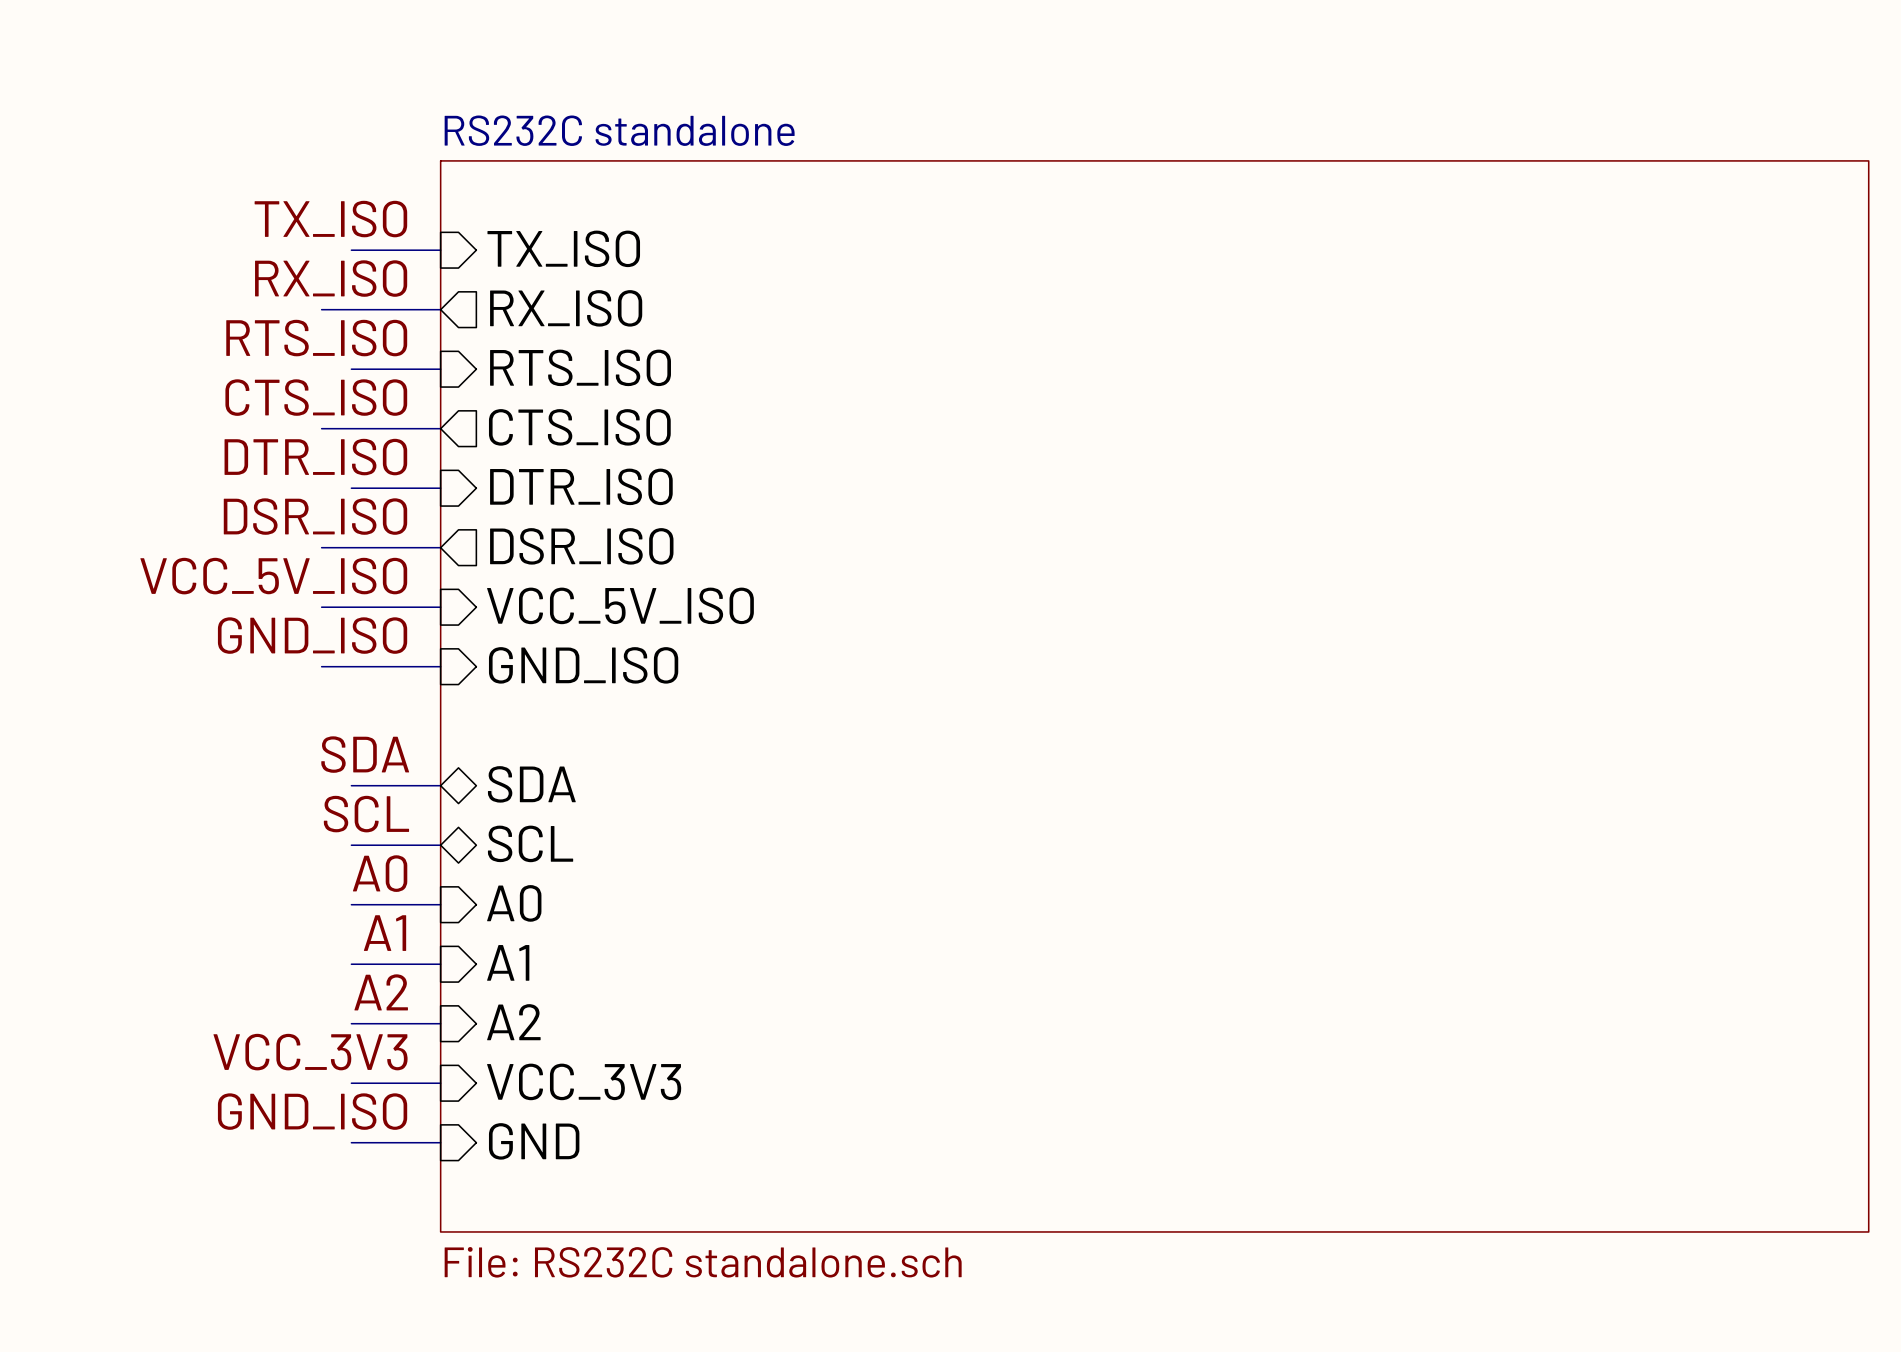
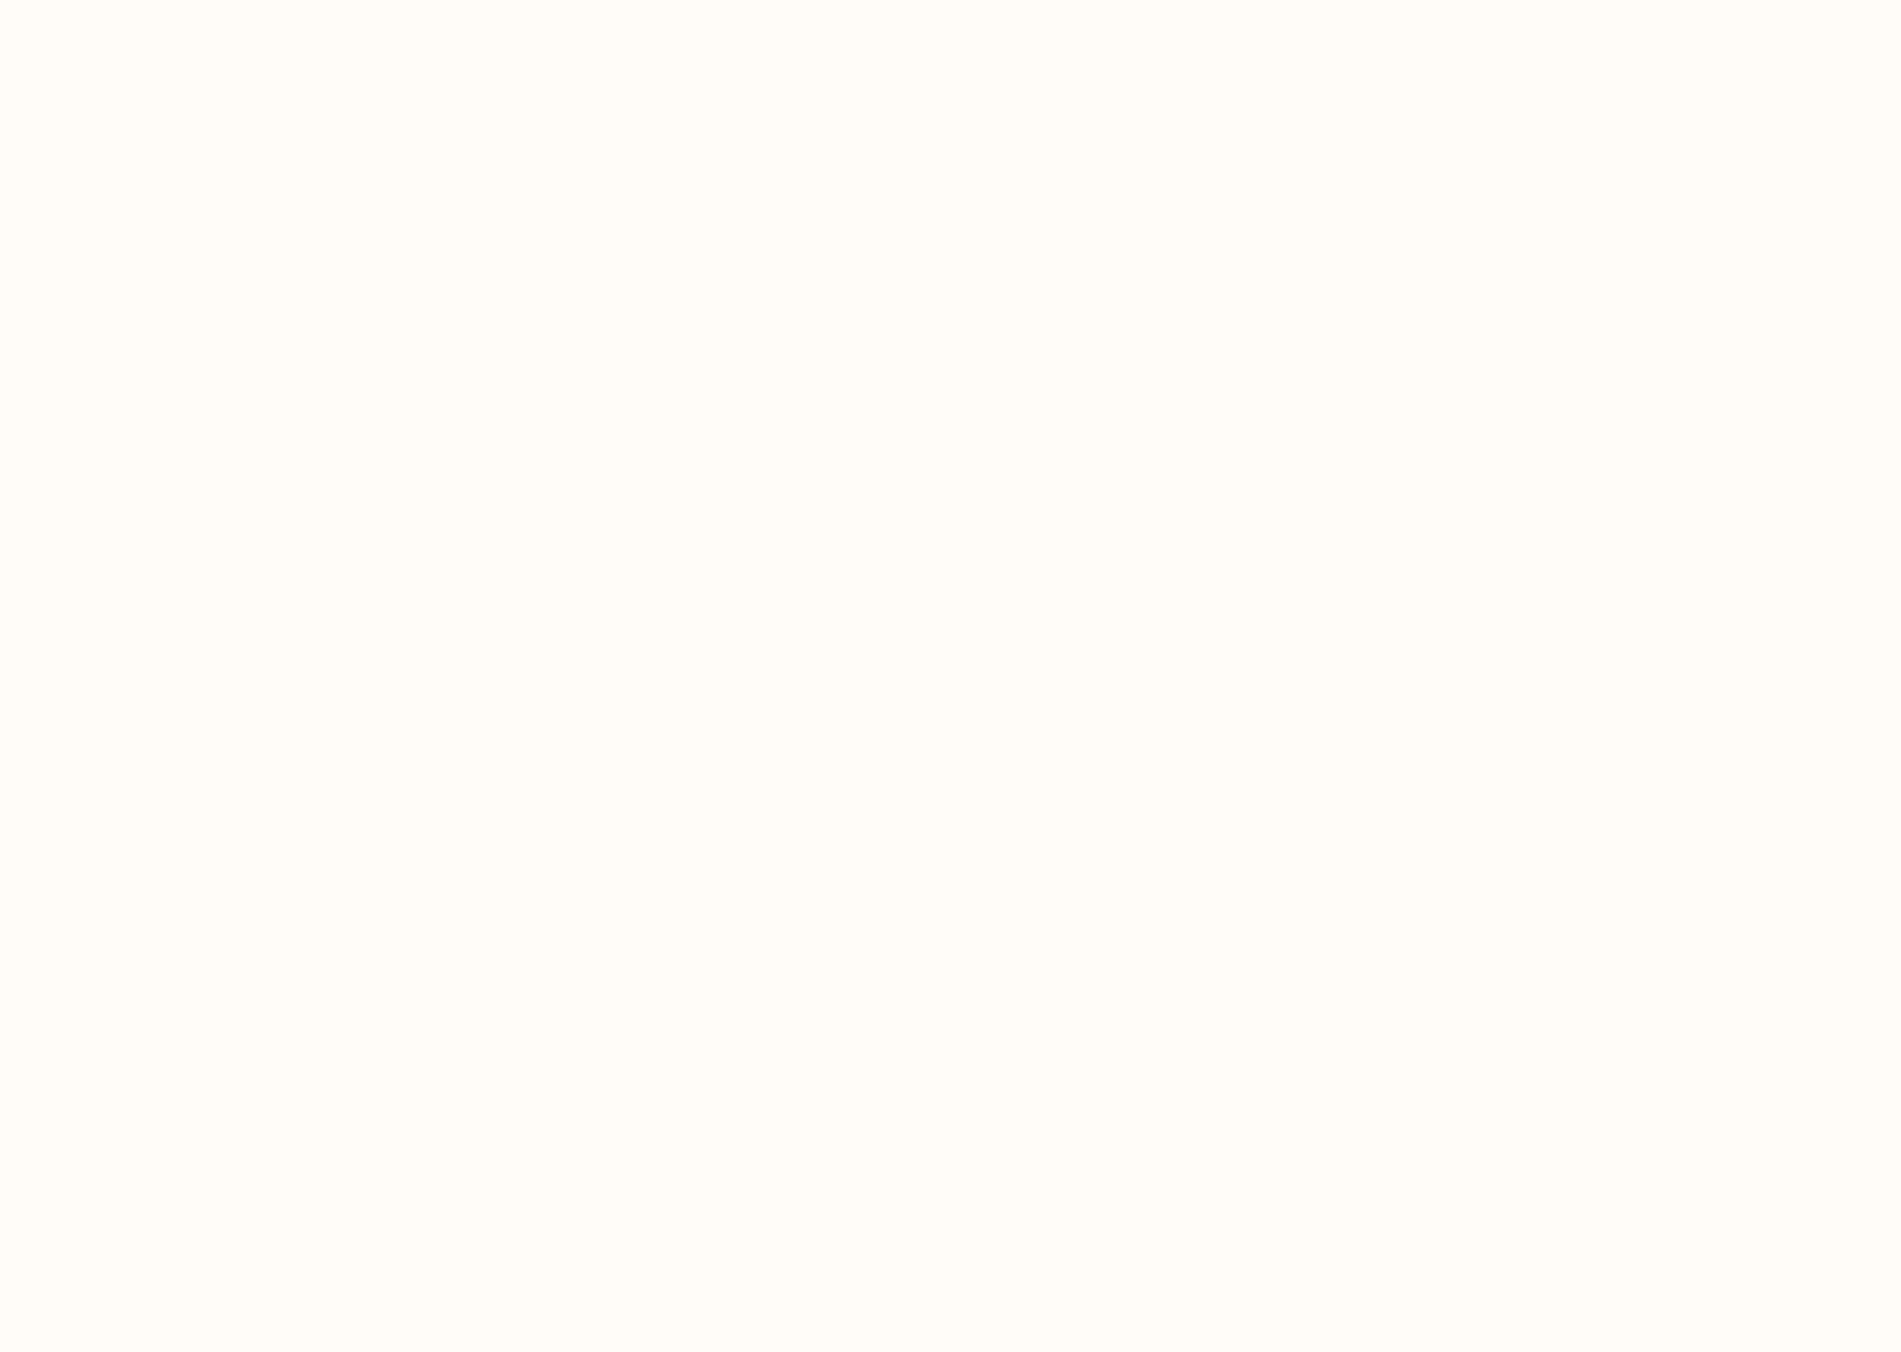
label: TX_ISO (330, 219) -> none
sheet pin: TX_ISO (563, 248) -> none
wire: (351, 250) (440, 250) -> none
label: RX_ISO (331, 278) -> none
sheet pin: RX_ISO (566, 308) -> none
wire: (321, 309) (440, 309) -> none
label: RTS_ISO (316, 338) -> none
sheet pin: RTS_ISO (580, 367) -> none
wire: (351, 369) (440, 369) -> none
label: CTS_ISO (316, 397) -> none
sheet pin: CTS_ISO (579, 427) -> none
wire: (321, 428) (440, 428) -> none
label: DTR_ISO (315, 457) -> none
sheet pin: DTR_ISO (581, 486) -> none
wire: (351, 488) (440, 488) -> none
label: DSR_ISO (315, 516) -> none
sheet pin: DSR_ISO (581, 546) -> none
wire: (321, 547) (440, 547) -> none
label: VCC_5V_ISO (273, 576) -> none
sheet pin: VCC_5V_ISO (620, 605) -> none
wire: (321, 607) (440, 607) -> none
label: GND_ISO (312, 635) -> none
sheet pin: GND_ISO (583, 665) -> none
wire: (321, 666) (440, 666) -> none
sheet RS232C standalone: File: RS232C standalone.sch (1154, 696) -> none
label: SDA (365, 754) -> none
sheet pin: SDA (531, 784) -> none
wire: (351, 785) (440, 785) -> none
label: SCL (366, 814) -> none
sheet pin: SCL (530, 843) -> none
wire: (351, 845) (440, 845) -> none
label: A0 (380, 873) -> none
sheet pin: A0 (514, 903) -> none
wire: (351, 904) (440, 904) -> none
label: A1 (384, 933) -> none
sheet pin: A1 (508, 962) -> none
wire: (351, 964) (440, 964) -> none
label: A2 (381, 992) -> none
sheet pin: A2 (513, 1022) -> none
wire: (351, 1023) (440, 1023) -> none
label: VCC_3V3 (310, 1052) -> none
sheet pin: VCC_3V3 (584, 1081) -> none
wire: (351, 1083) (440, 1083) -> none
label: GND_ISO (312, 1111) -> none
sheet pin: GND (534, 1141) -> none
wire: (351, 1142) (440, 1142) -> none

